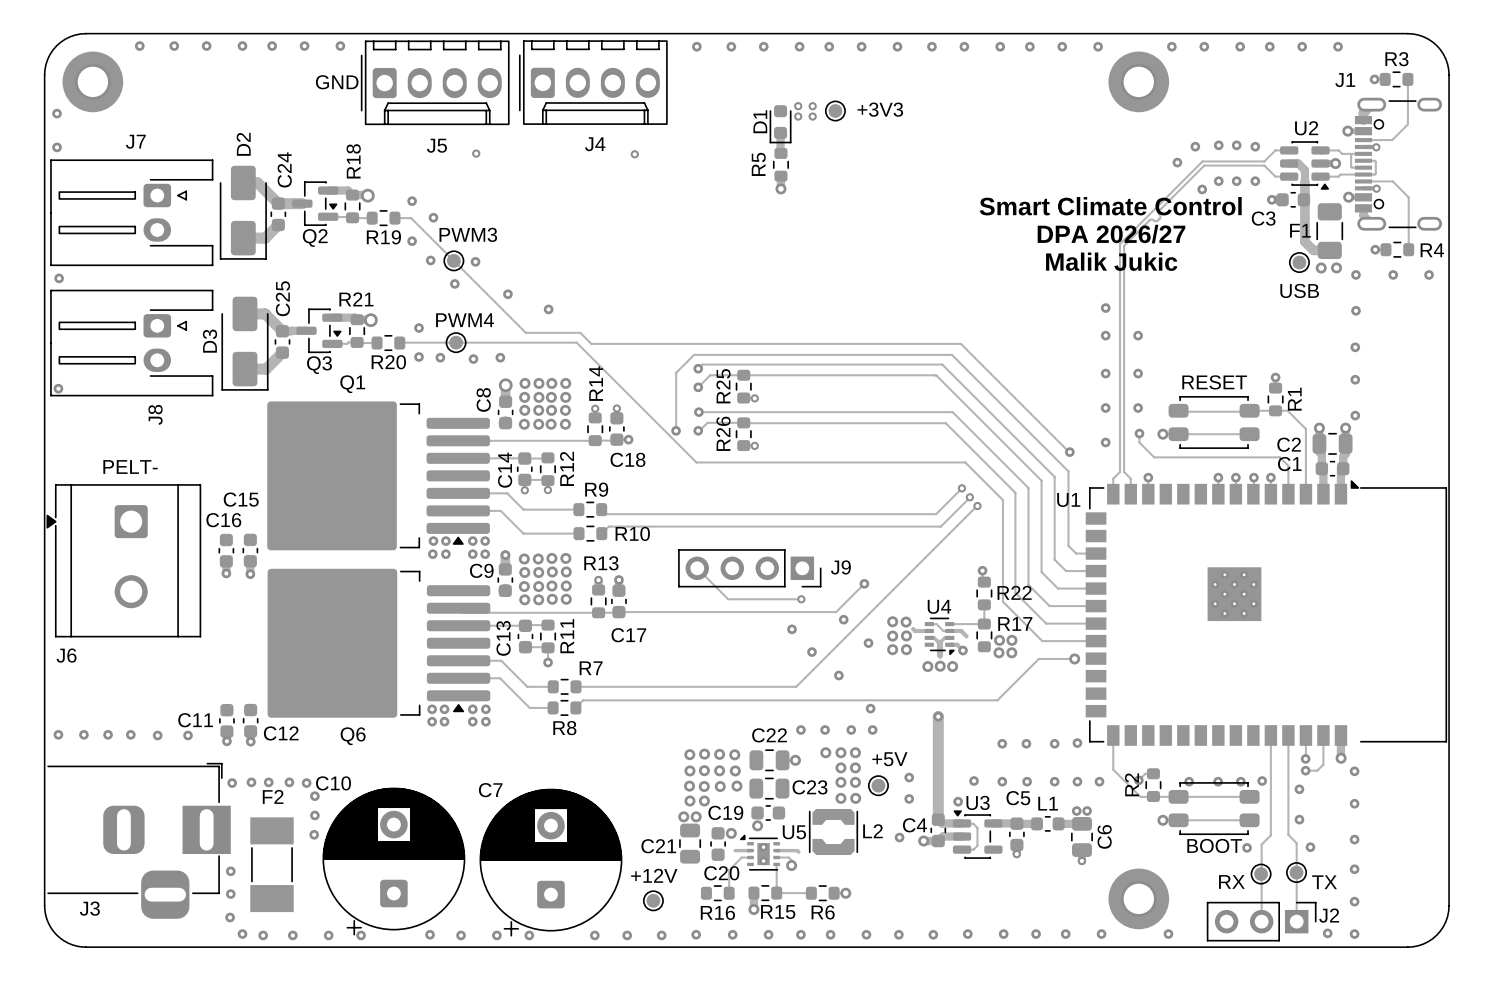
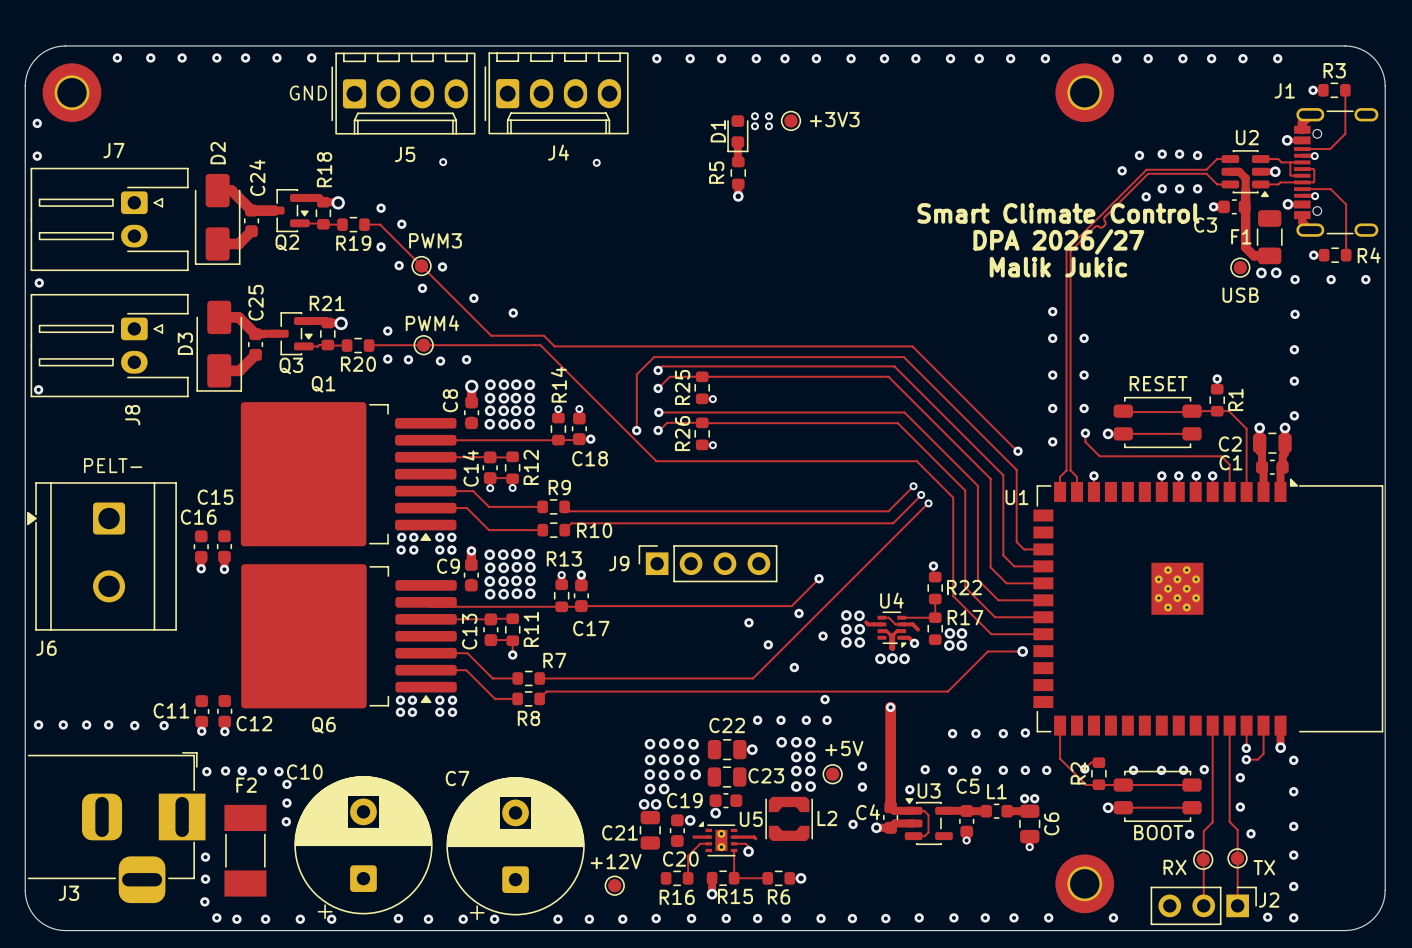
track: (697, 568) (728, 599) (801, 599) -> none
J9 rotation: 0° (749, 568) -> 180° (708, 563)
via: (801, 599) -> none

